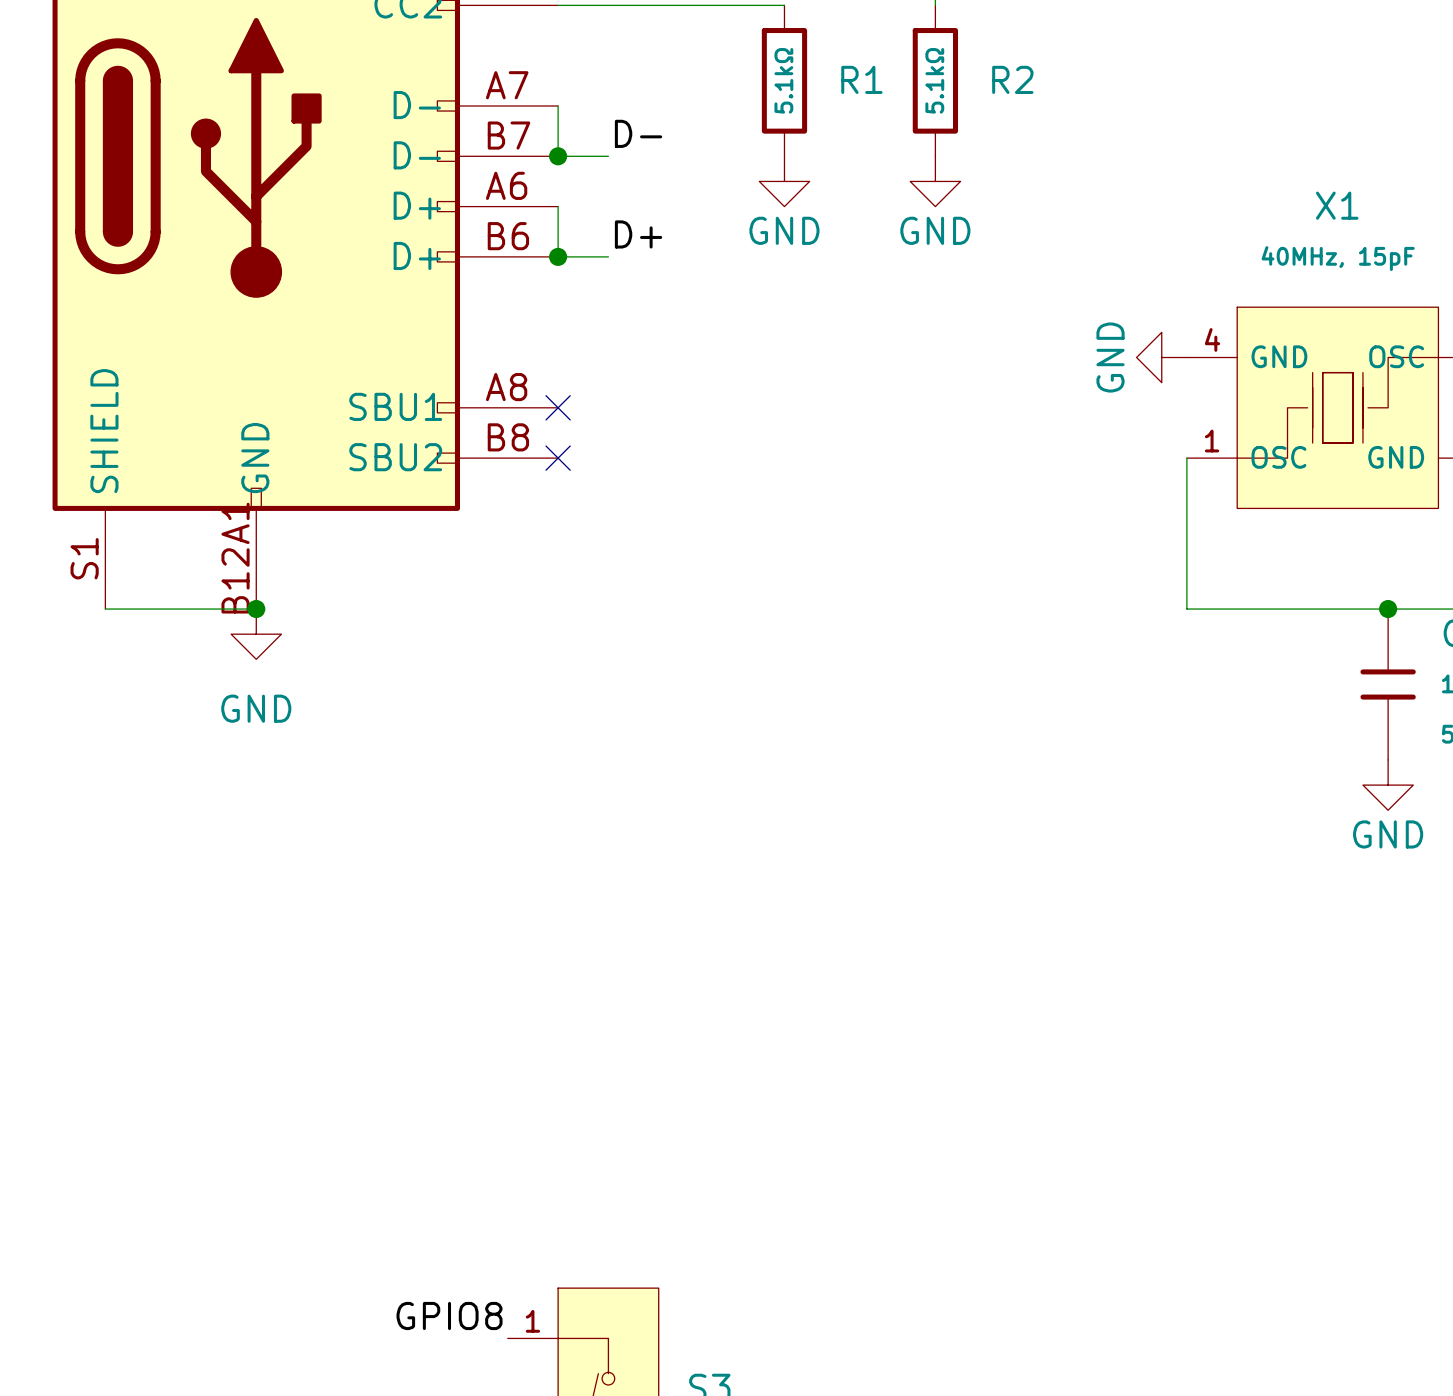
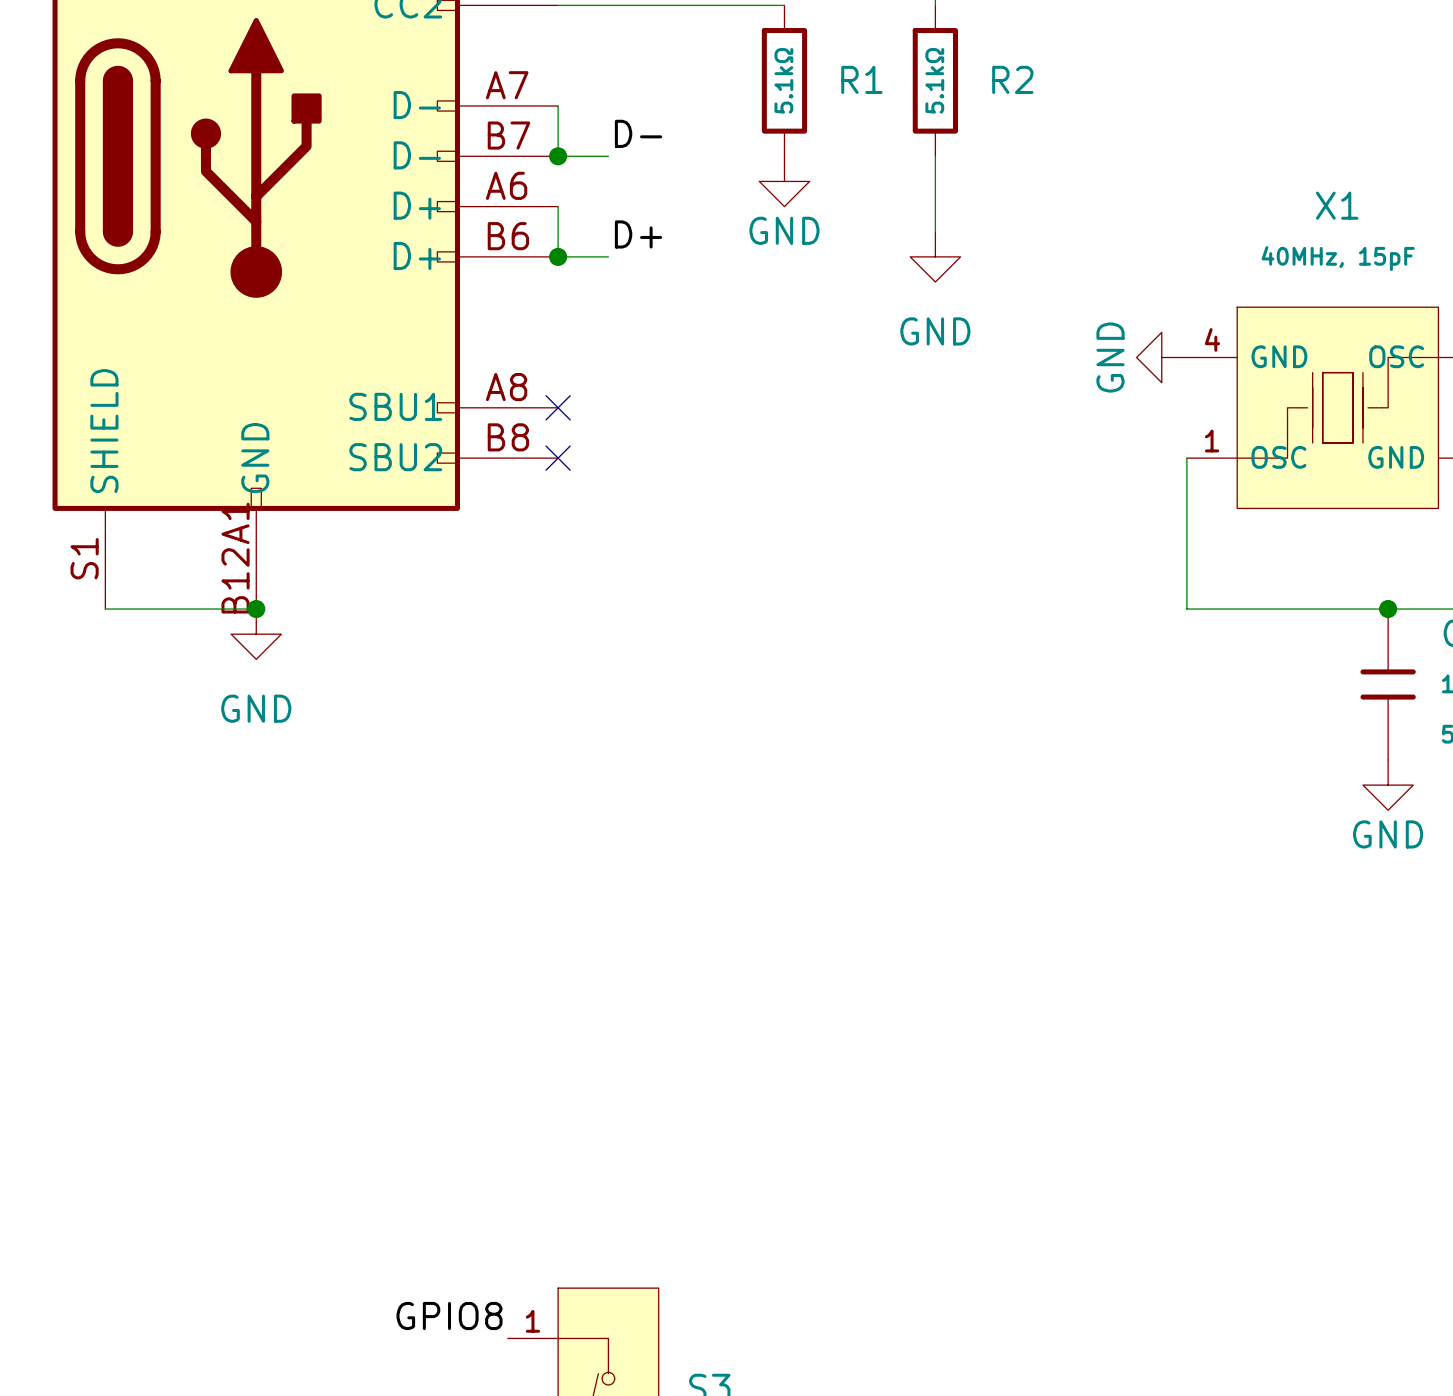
wire: none -> (935, 156) (935, 231)
power symbol position: GND (935, 181) -> GND (935, 256)
power symbol text position: GND (935, 230) -> GND (935, 331)

